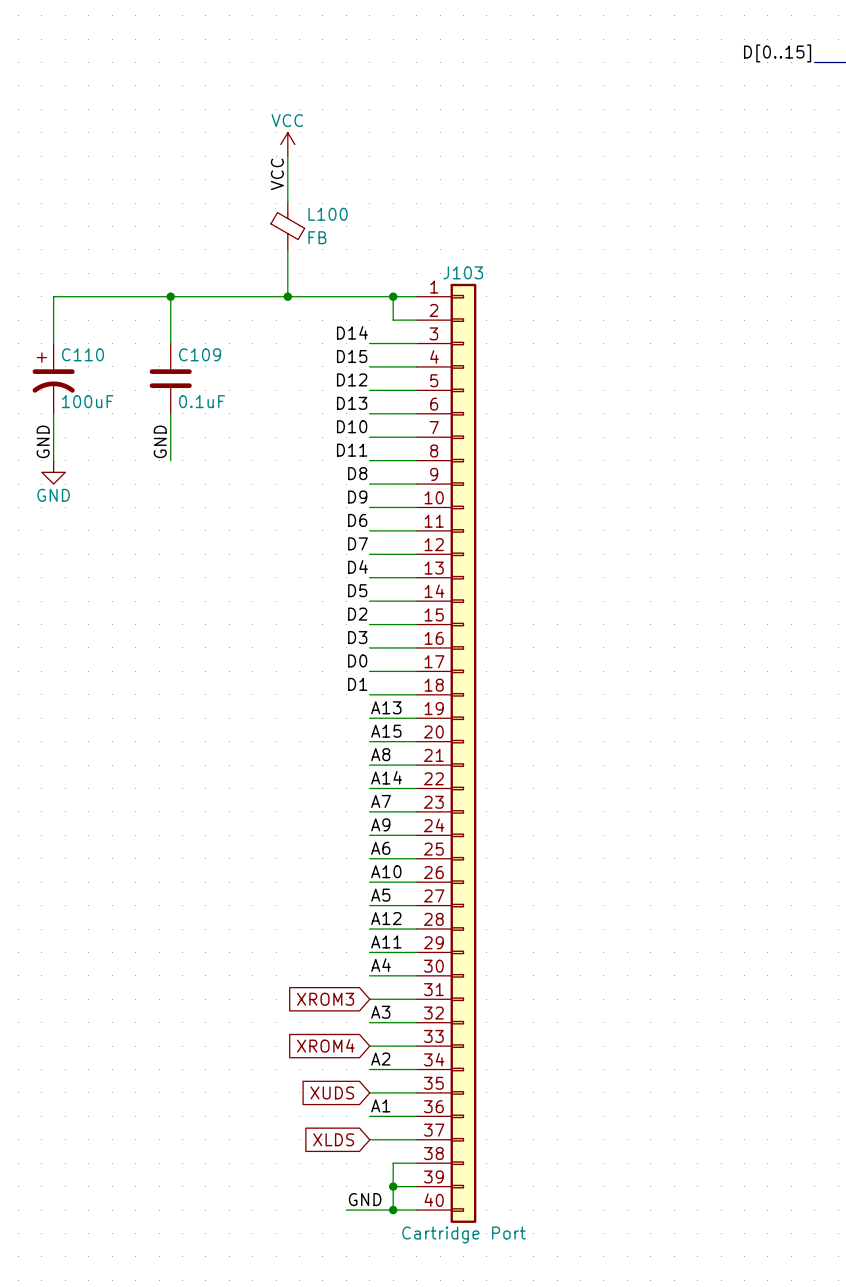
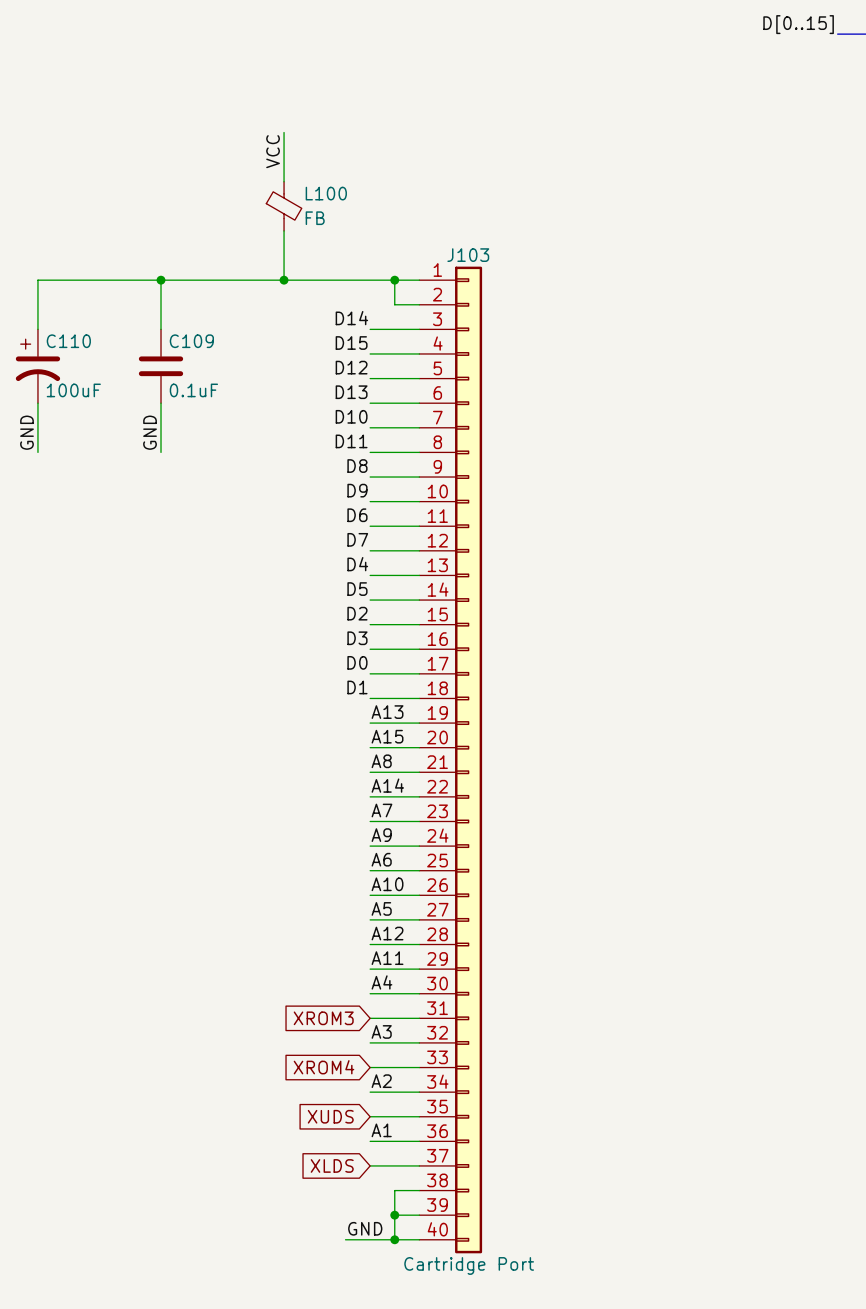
power symbol: VCC (287, 144) -> none
power symbol: GND (53, 472) -> none

